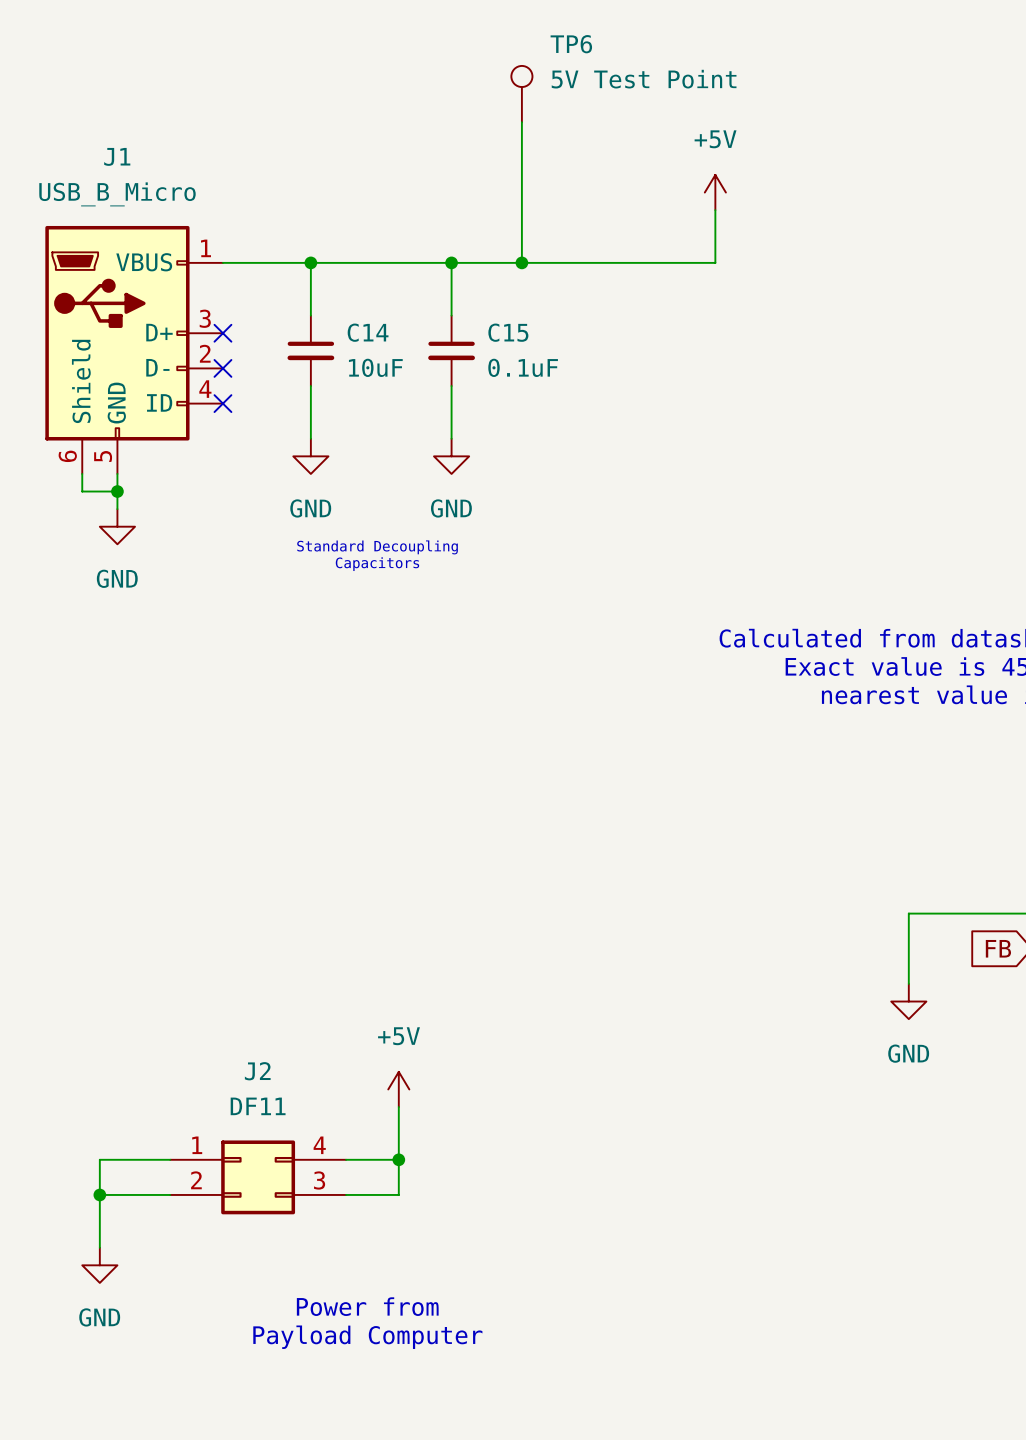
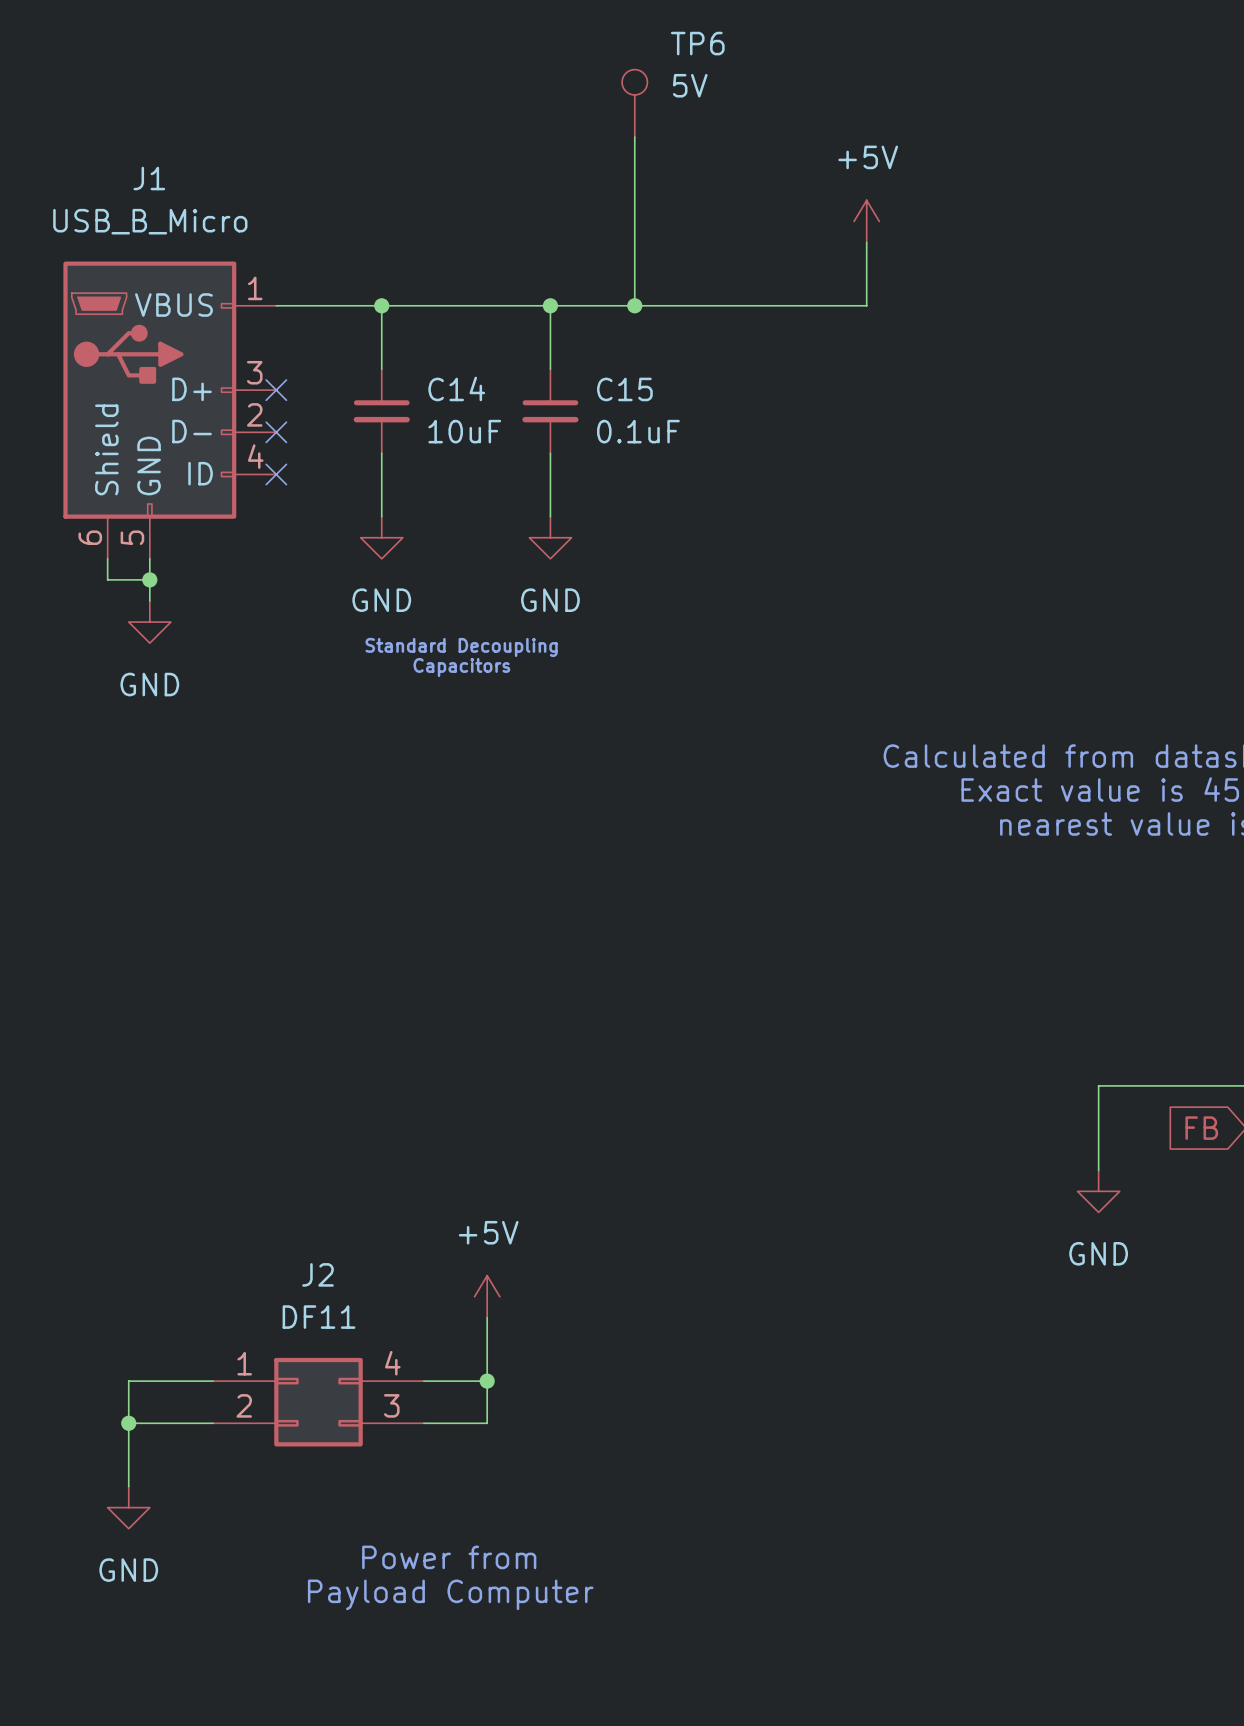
TP6 value: 5V Test Point (644, 79) -> 5V (690, 85)

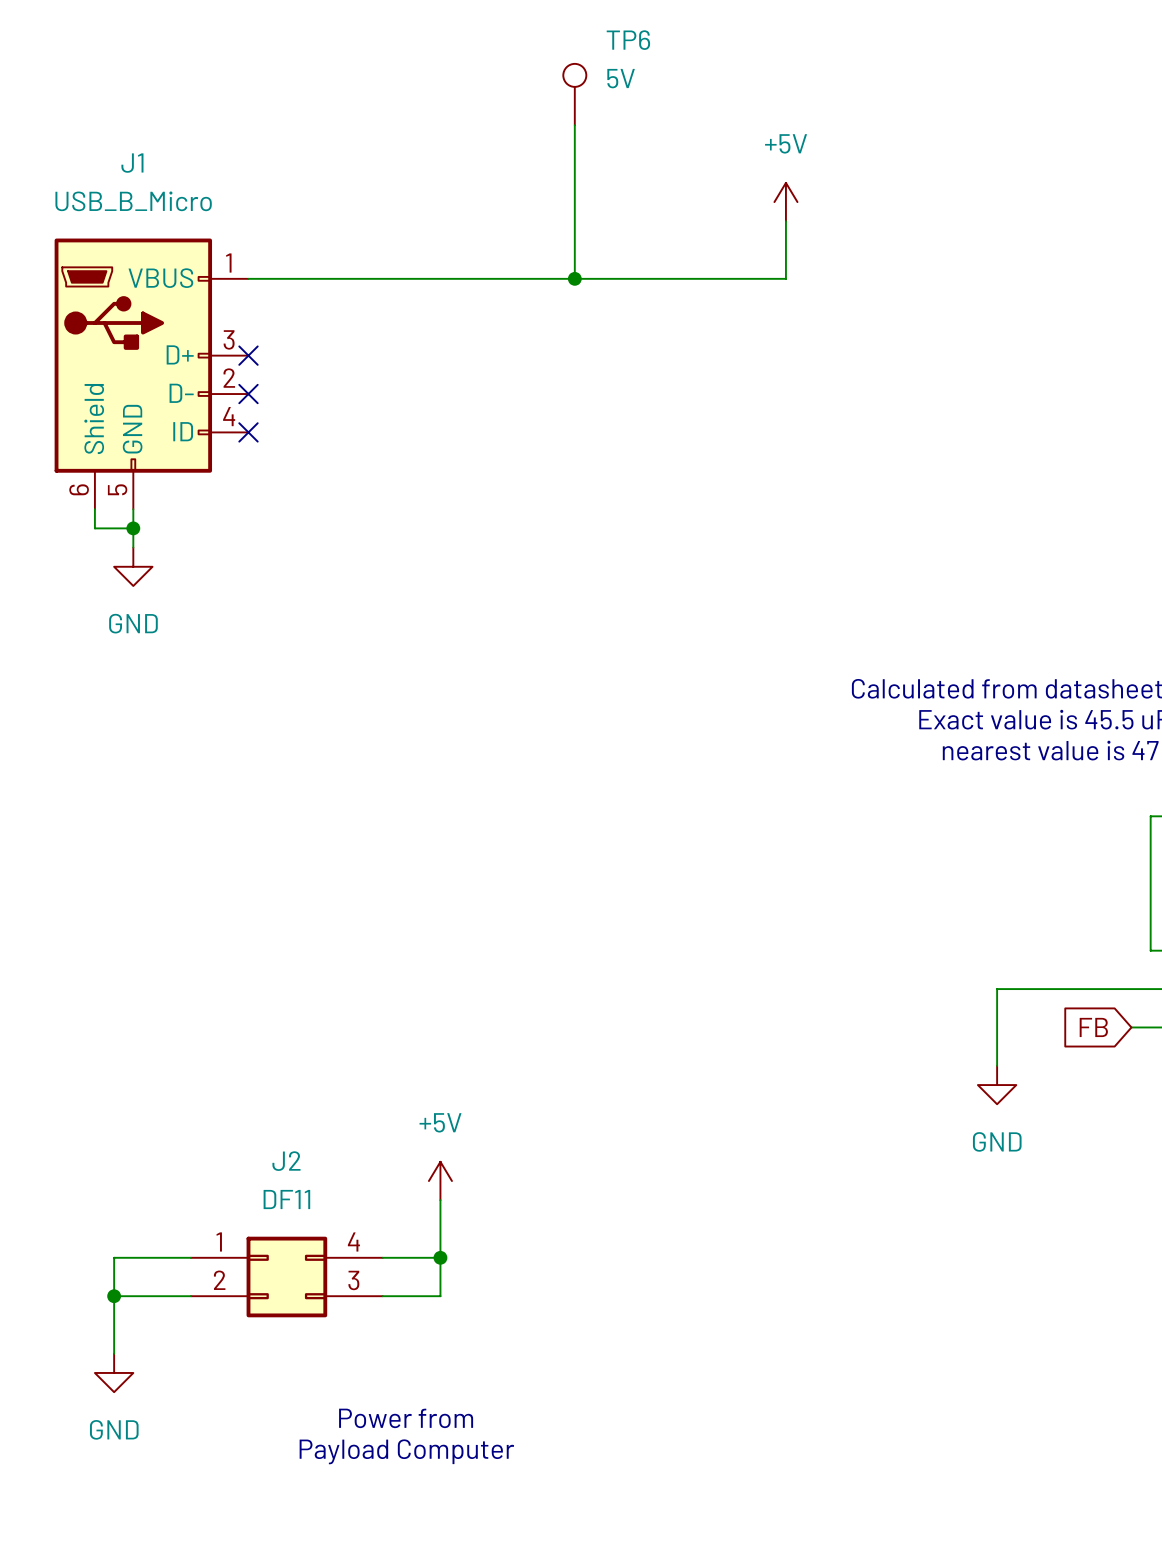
wire: (381, 305) (381, 369) -> none
junction: (381, 305) -> none
wire: (550, 305) (550, 369) -> none
junction: (550, 305) -> none
C14: 10uF (381, 411) -> none
C15: 0.1uF (550, 411) -> none
wire: (381, 453) (381, 516) -> none
wire: (550, 453) (550, 516) -> none
power symbol: GND (381, 537) -> none
power symbol: GND (550, 537) -> none
text: Standard Decoupling (461, 647) -> none
text: Capacitors (461, 667) -> none

